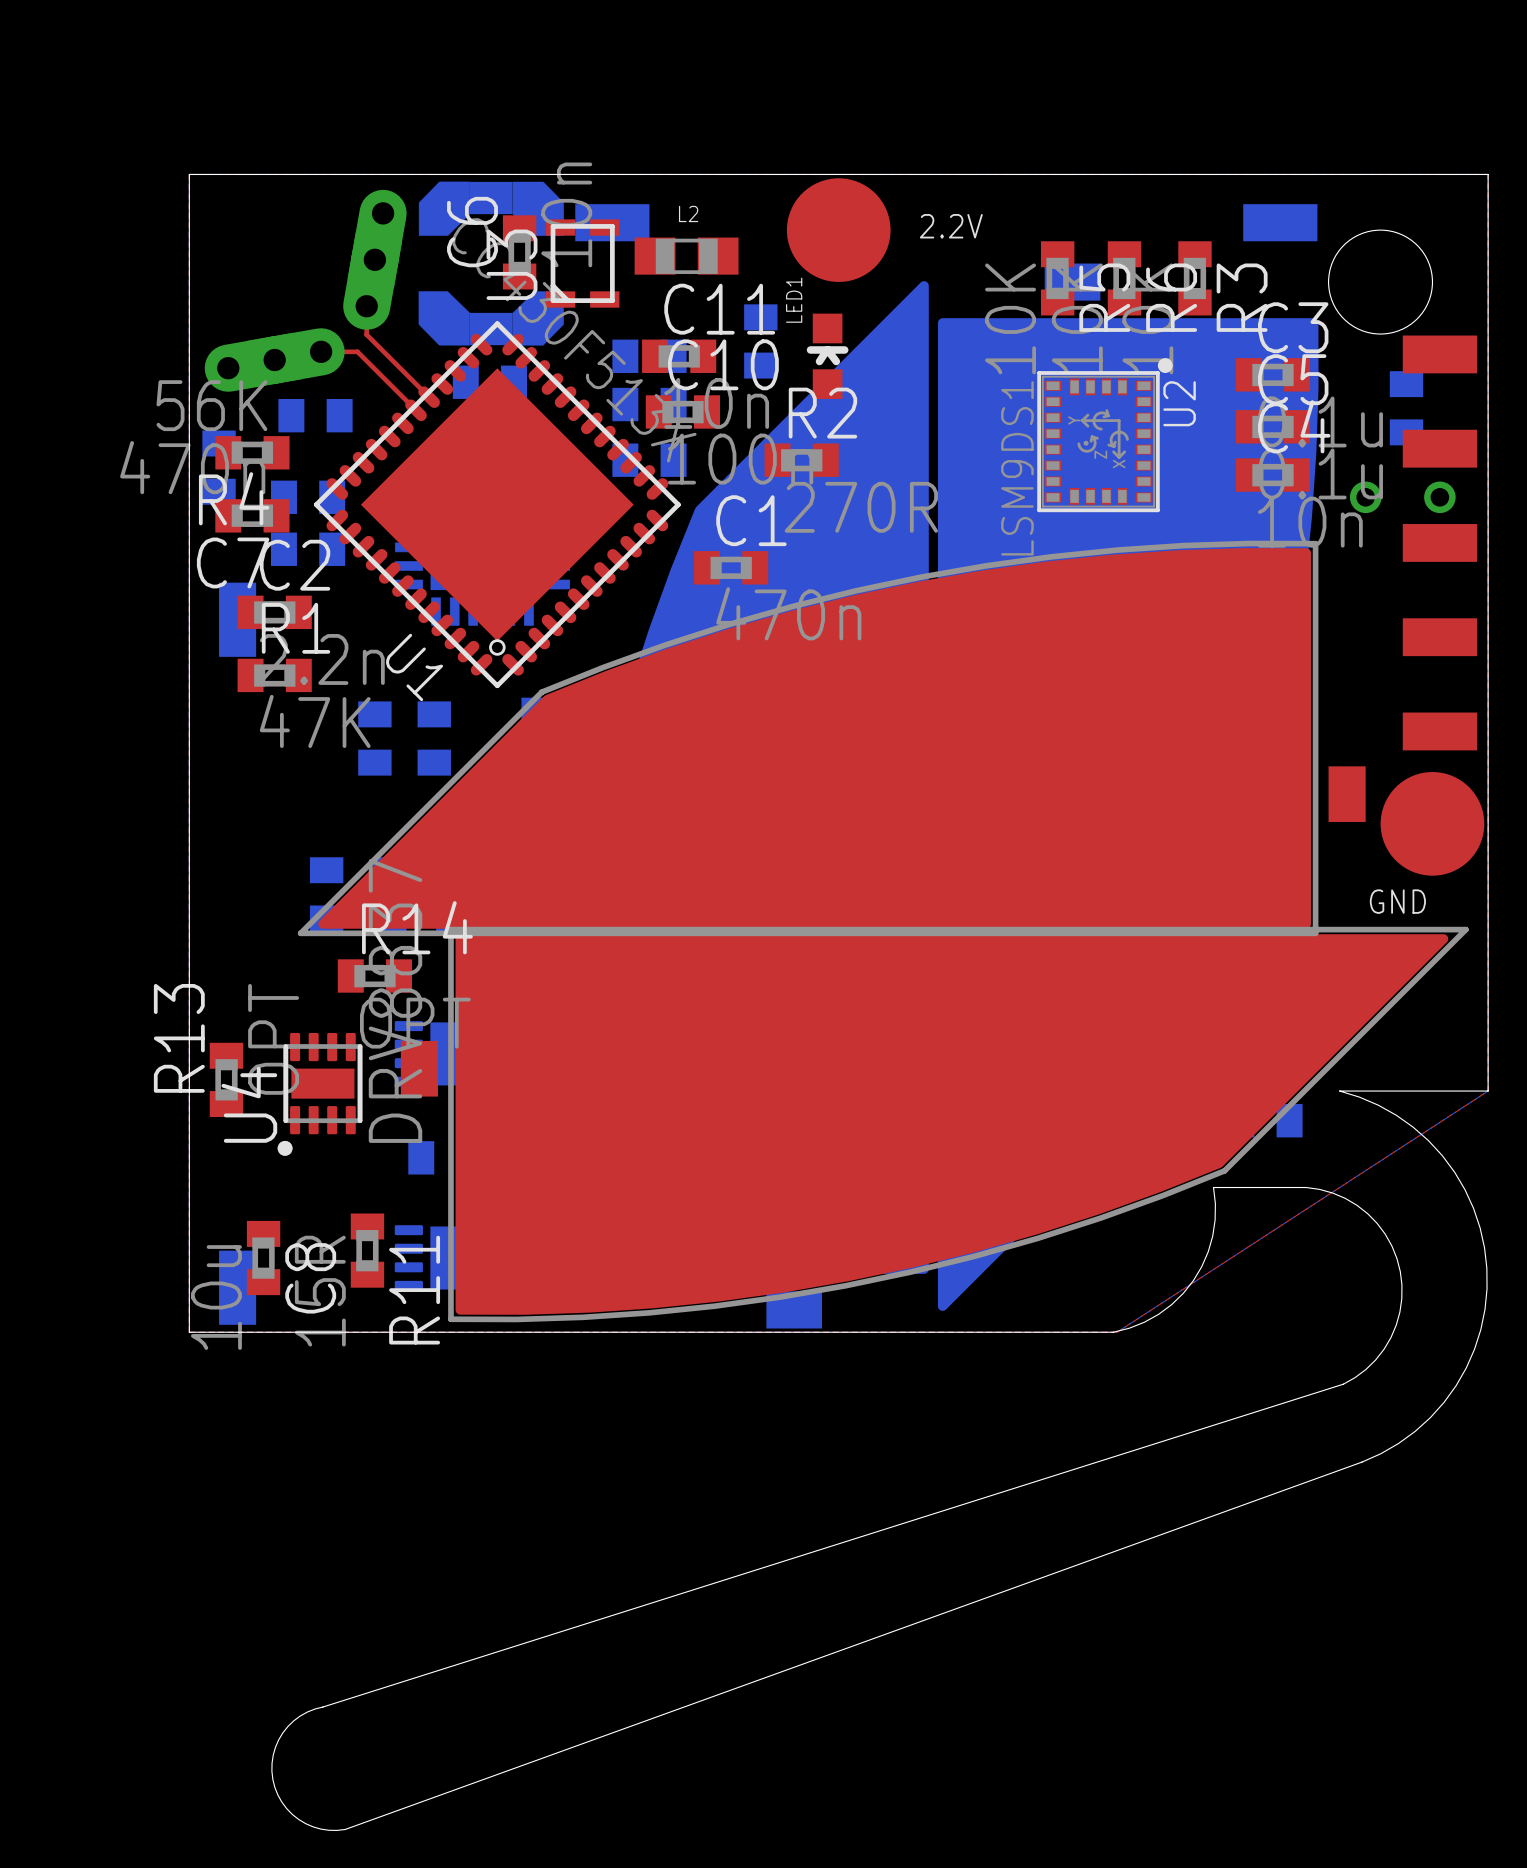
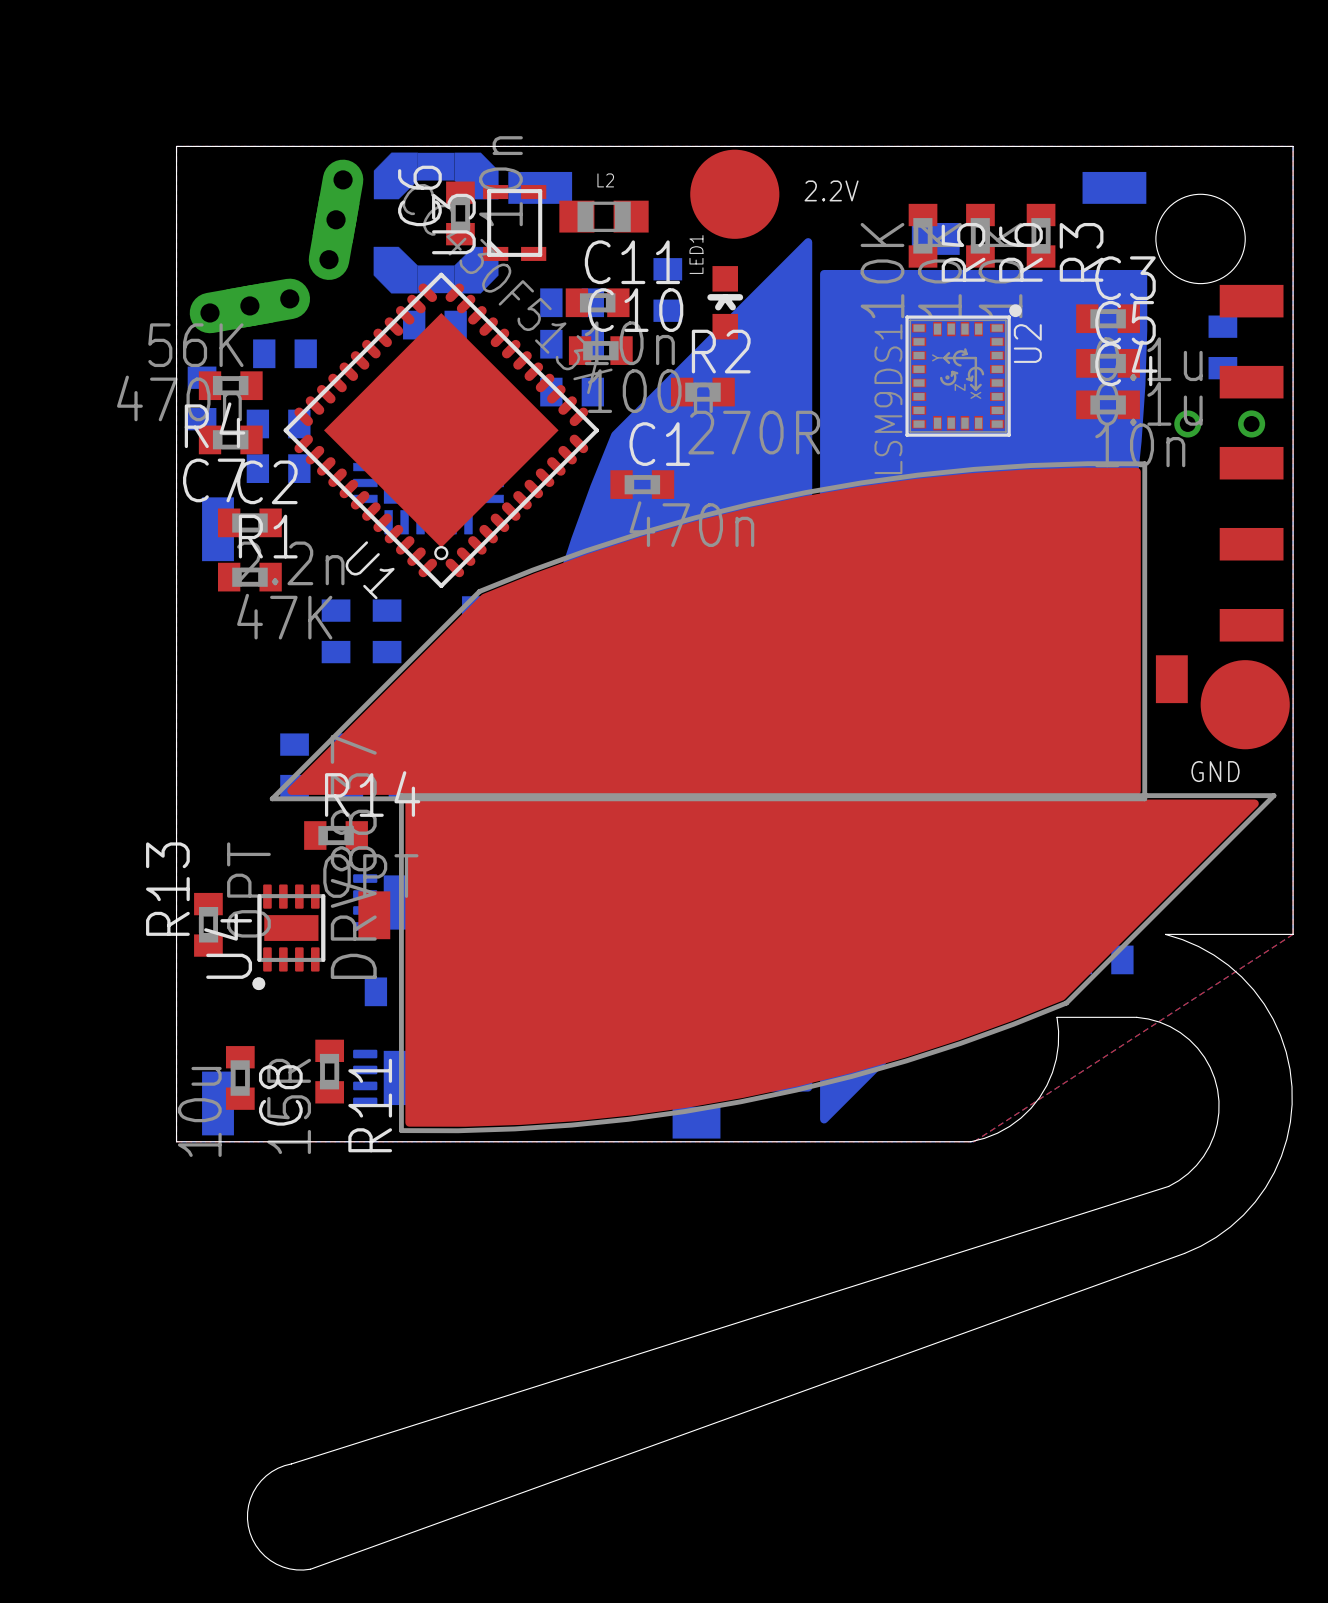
top track: (366, 306) (366, 334) (429, 397) -> none
top track: (321, 351) (357, 351) (416, 410) -> none

